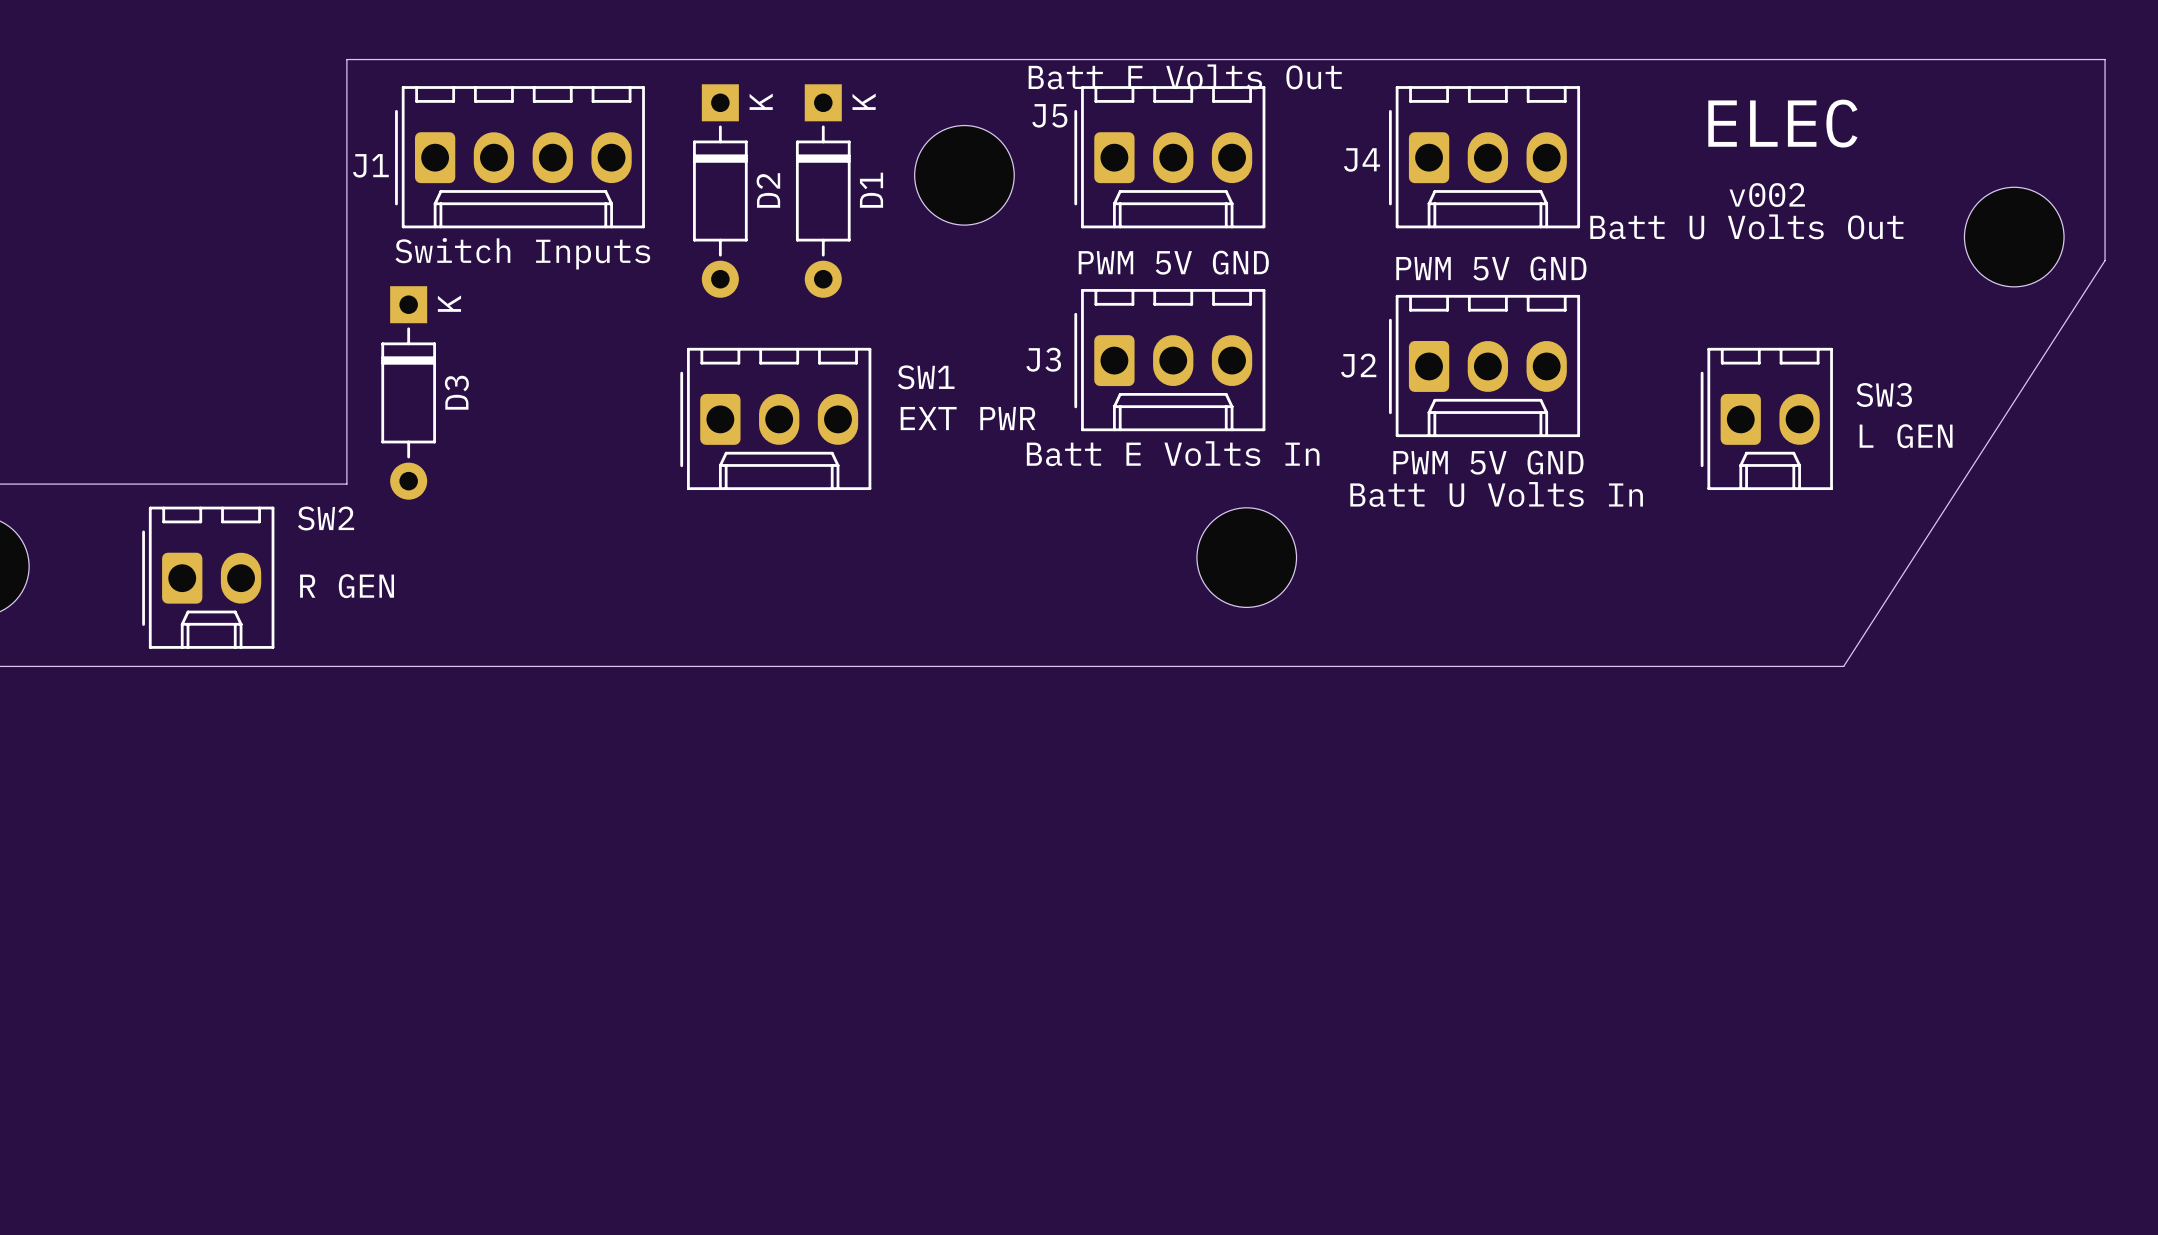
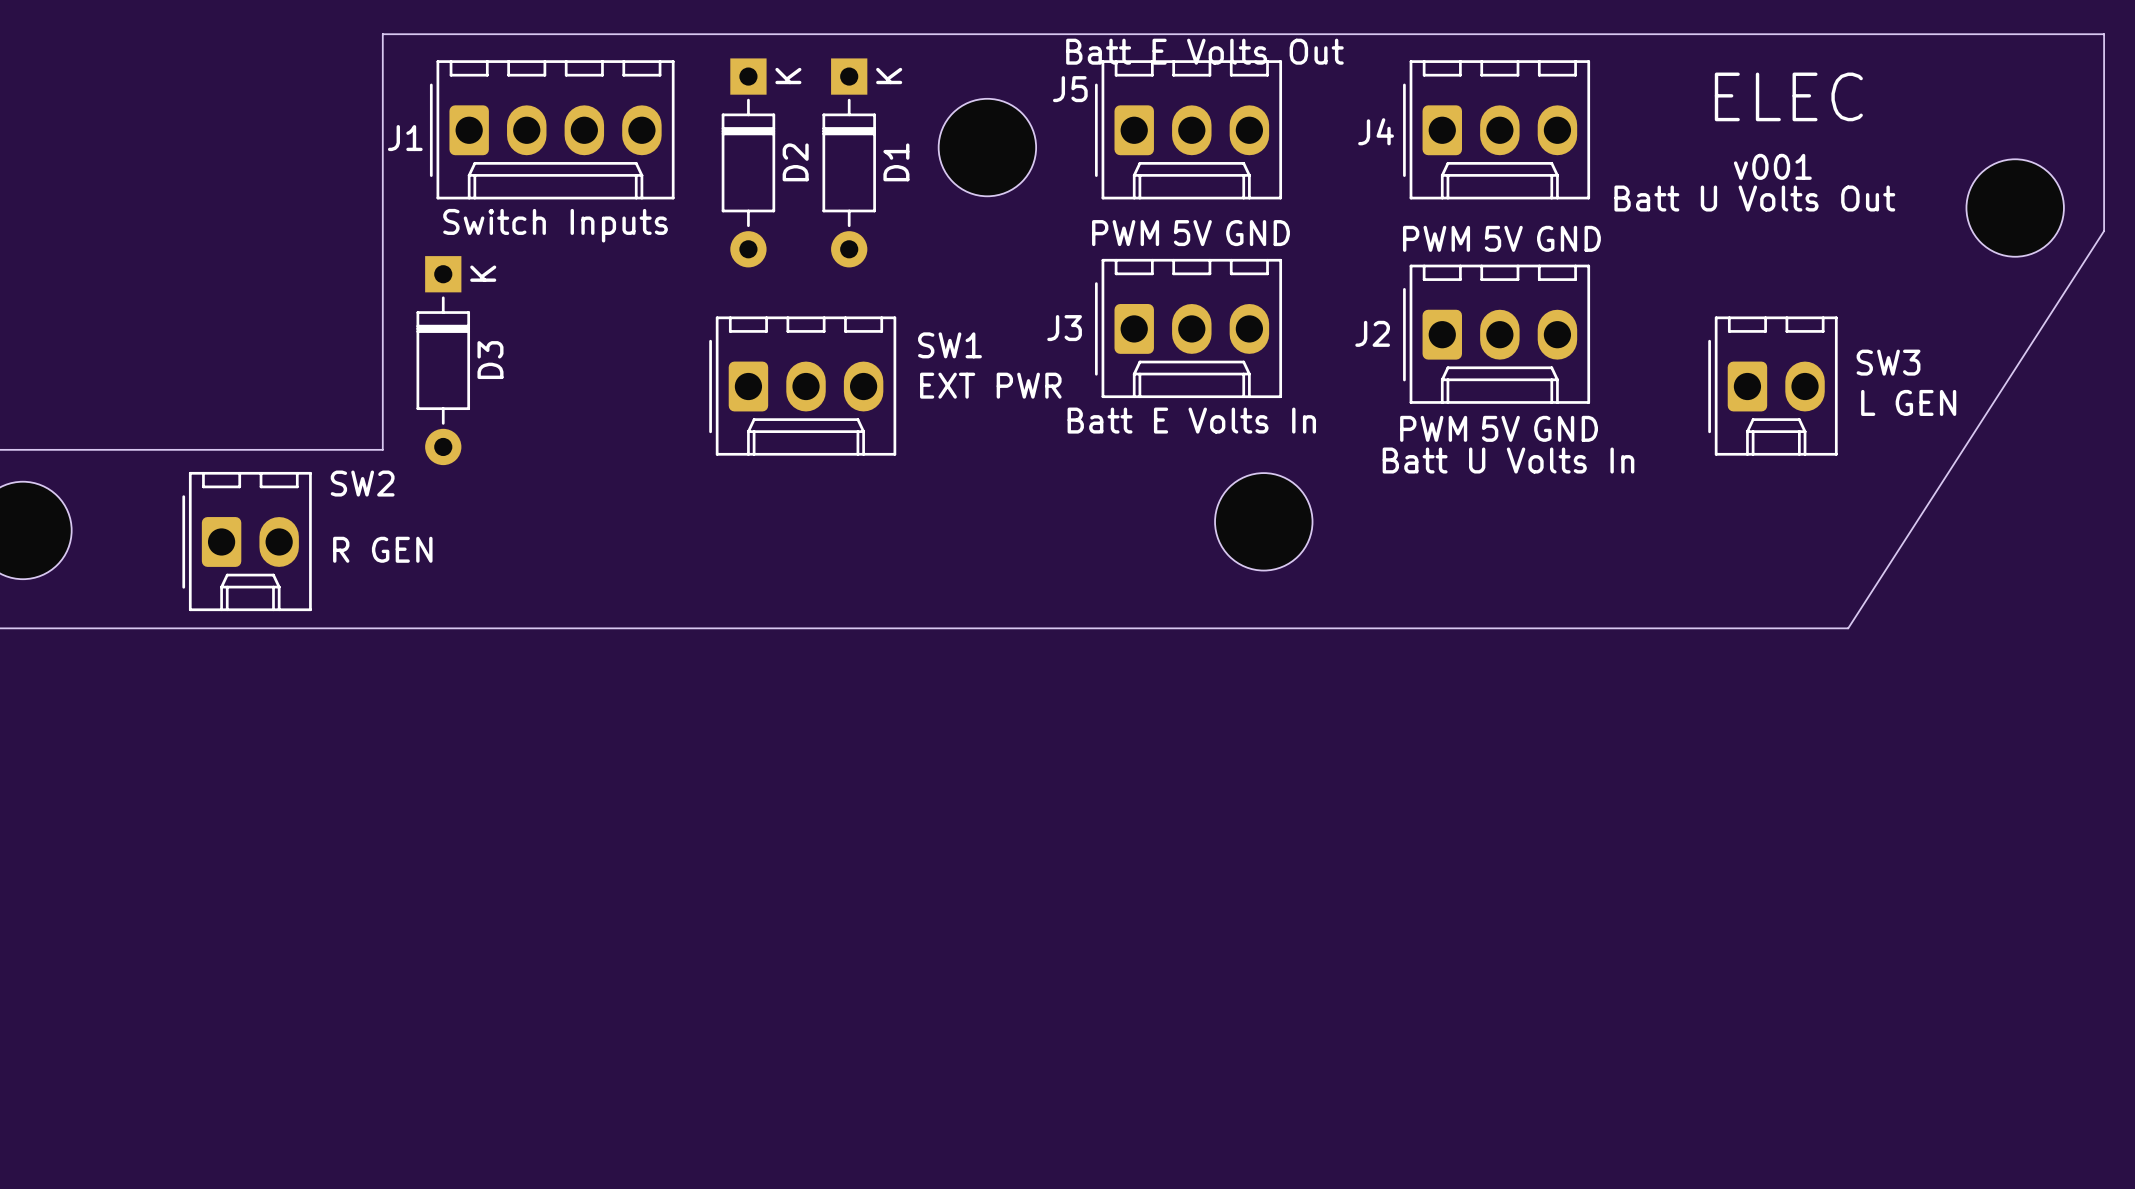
text: v002 (1767, 195) -> v001 (1772, 166)

